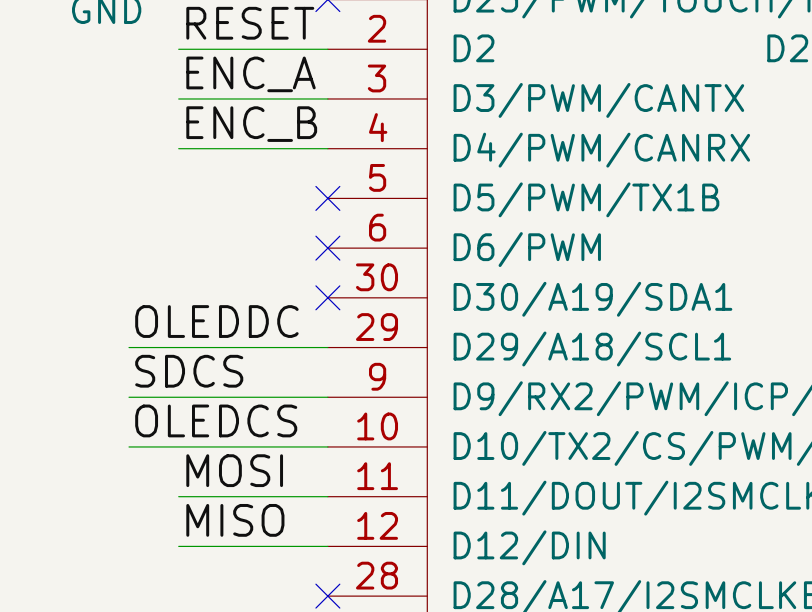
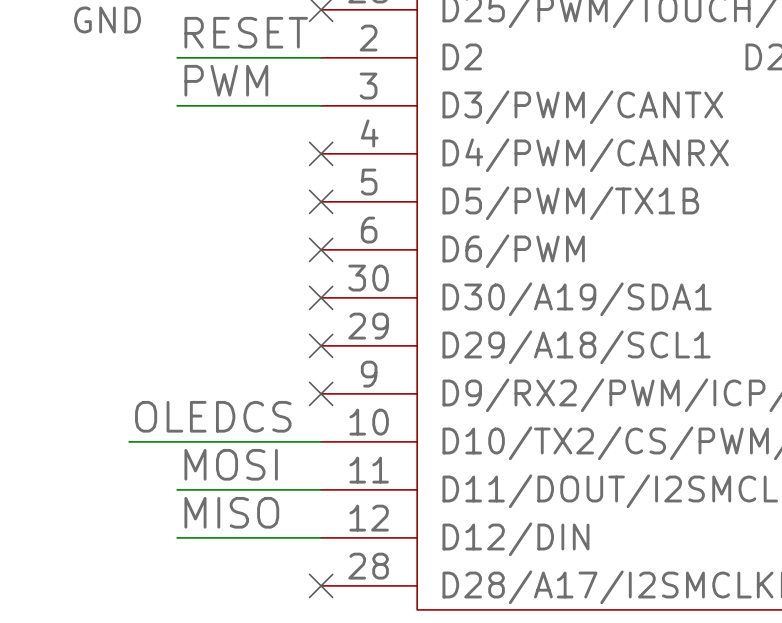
label: ENC_A (251, 74) -> PWM (226, 80)
label: ENC_B (251, 124) -> none
wire: (178, 148) (327, 148) -> none
no-connect mark: none -> (321, 153)
label: OLEDDC (216, 321) -> none
wire: (129, 347) (327, 347) -> none
no-connect mark: none -> (321, 345)
label: SDCS (189, 371) -> none
wire: (129, 397) (327, 397) -> none
no-connect mark: none -> (321, 393)

